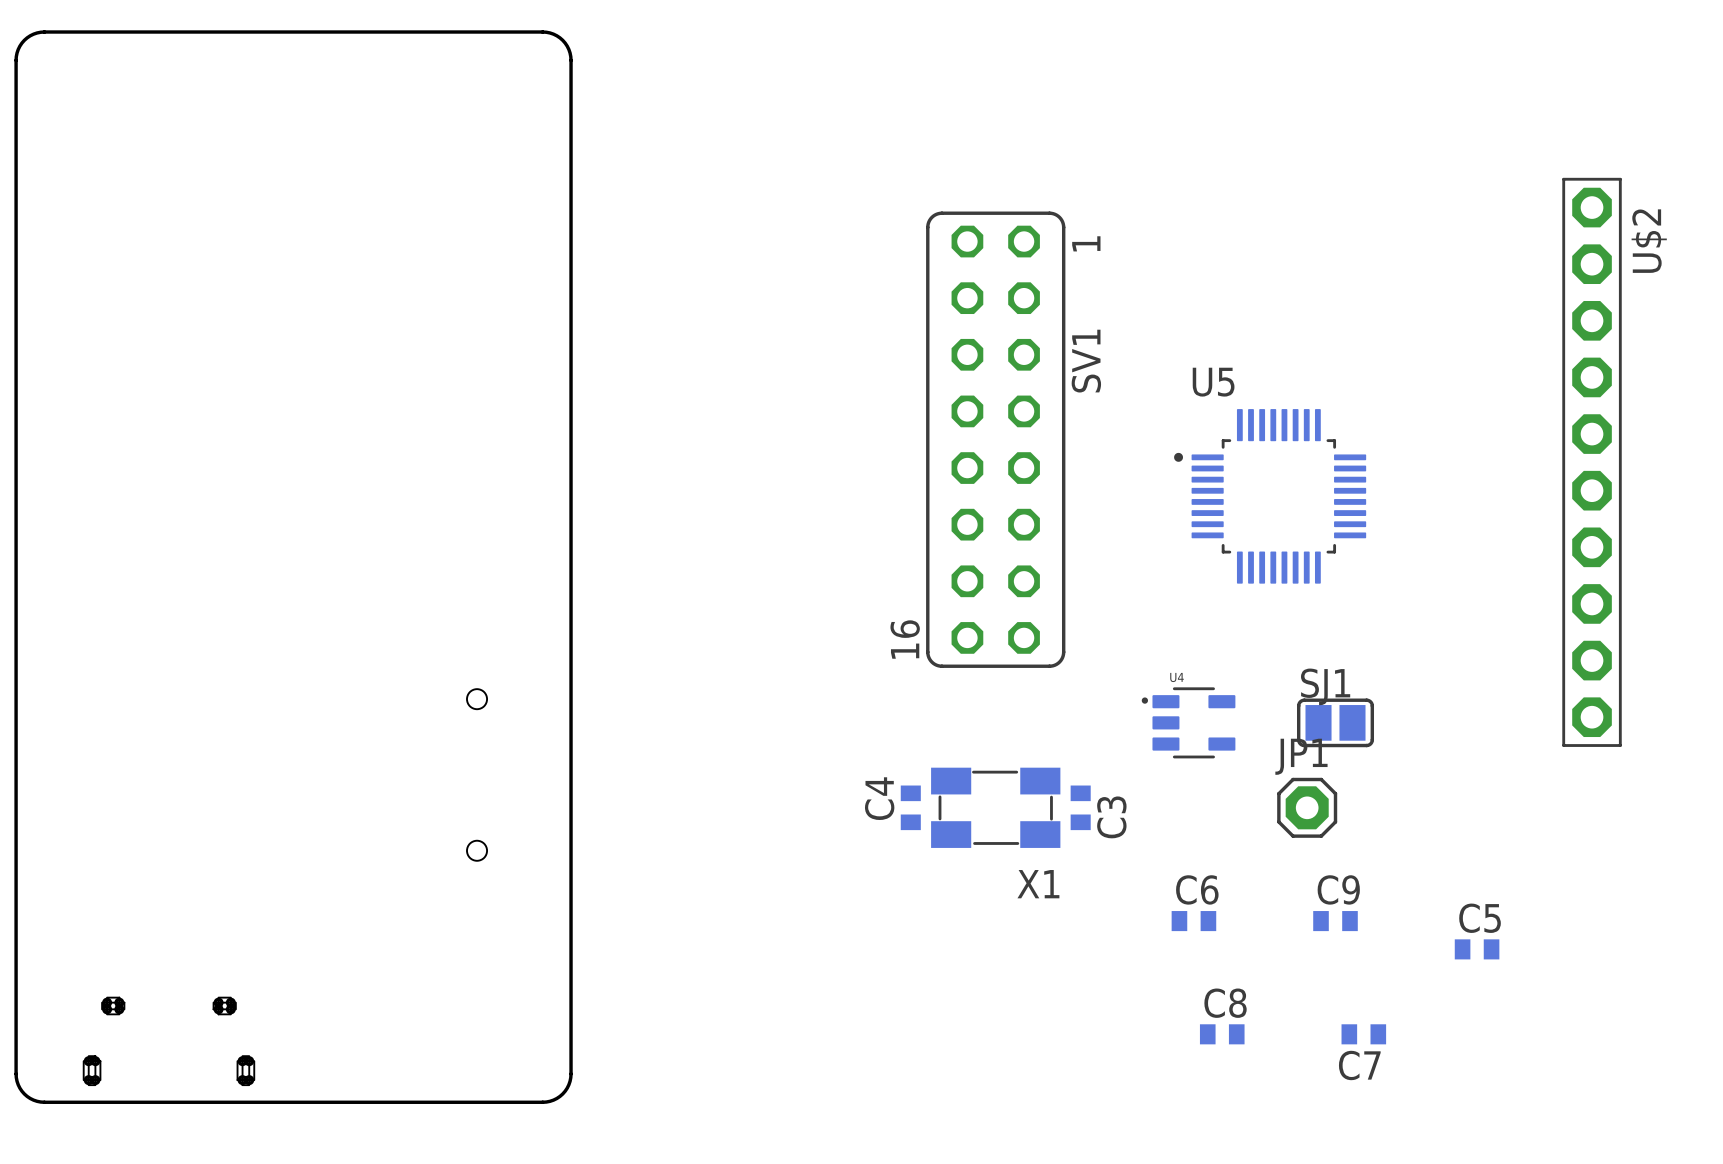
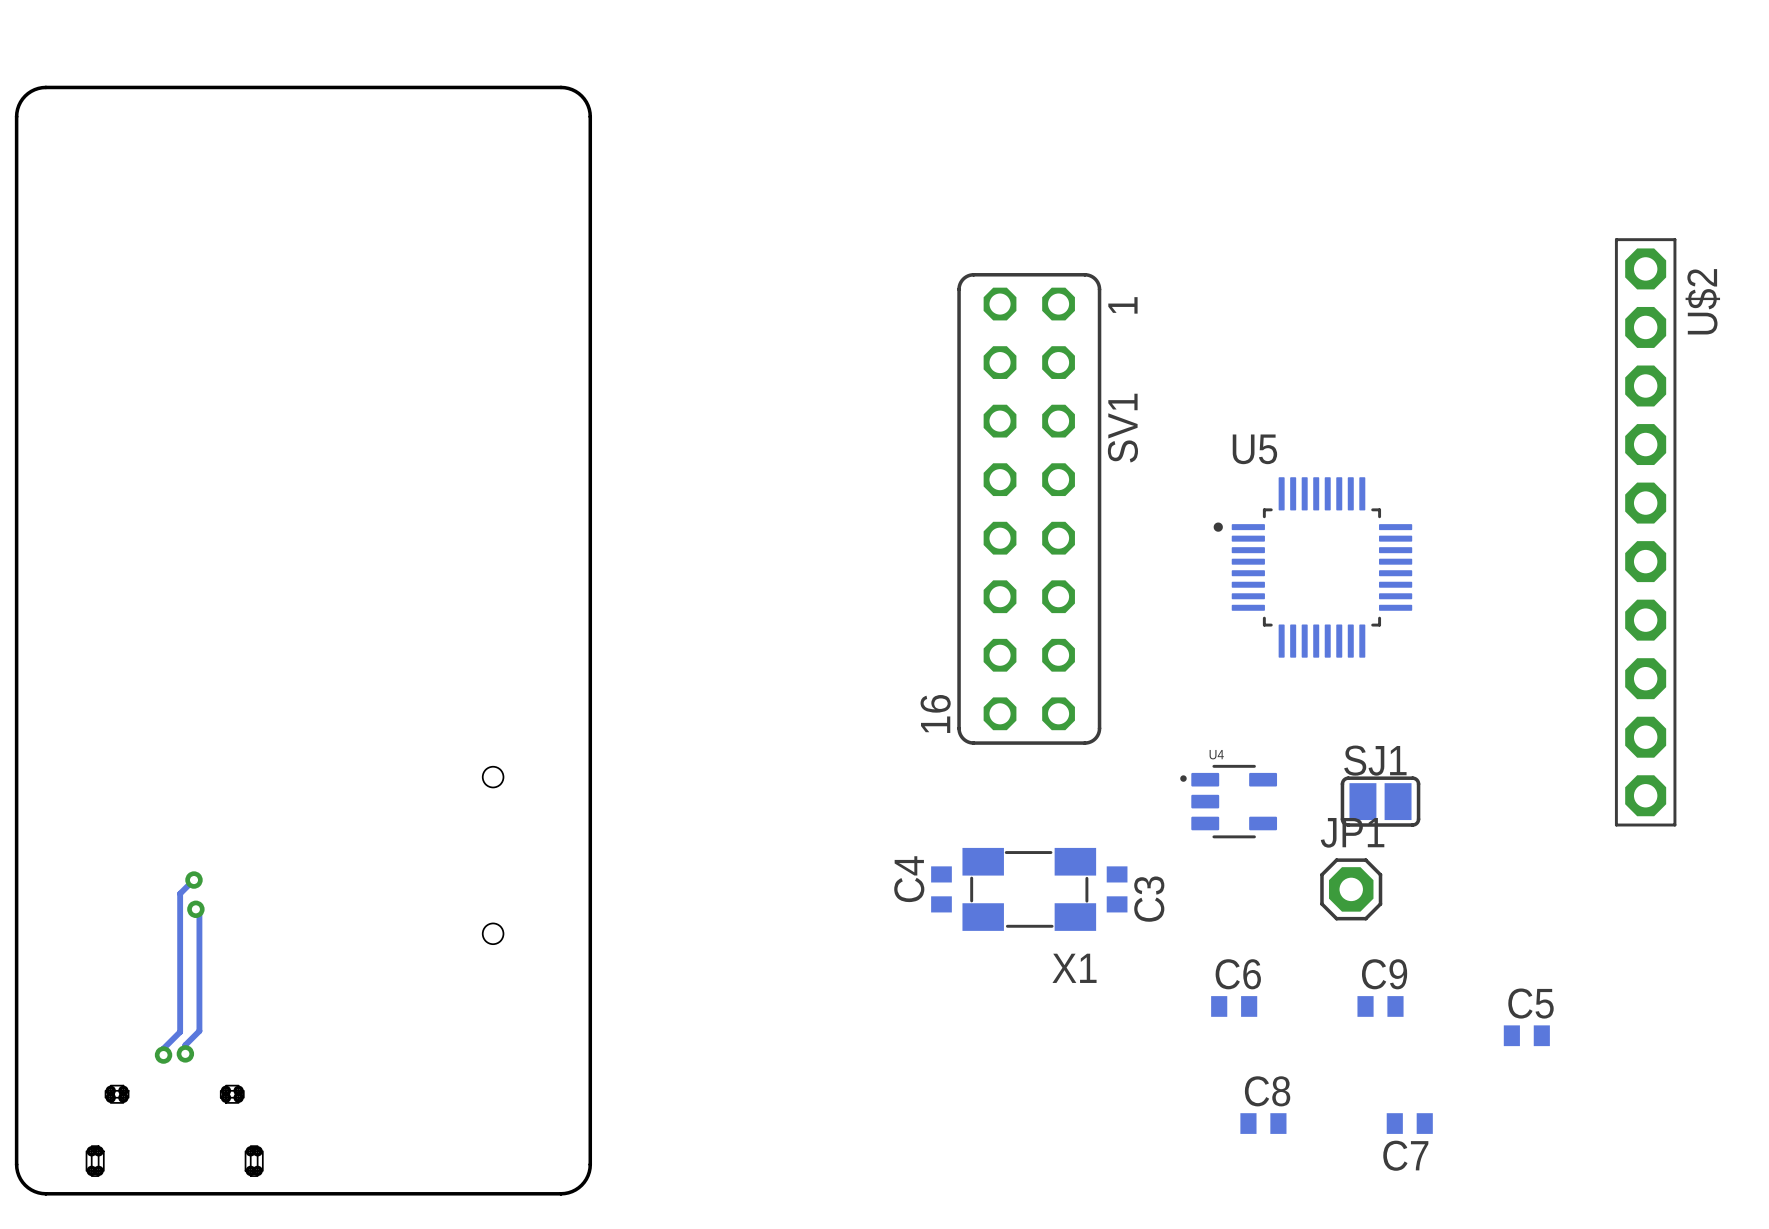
track: none -> (193, 880) (180, 893) (180, 1032) (163, 1048) (163, 1055)
via: none -> (193, 880)
track: none -> (195, 909) (199, 912) (199, 1031) (185, 1045) (185, 1053)
via: none -> (195, 909)
via: none -> (185, 1053)
via: none -> (163, 1055)

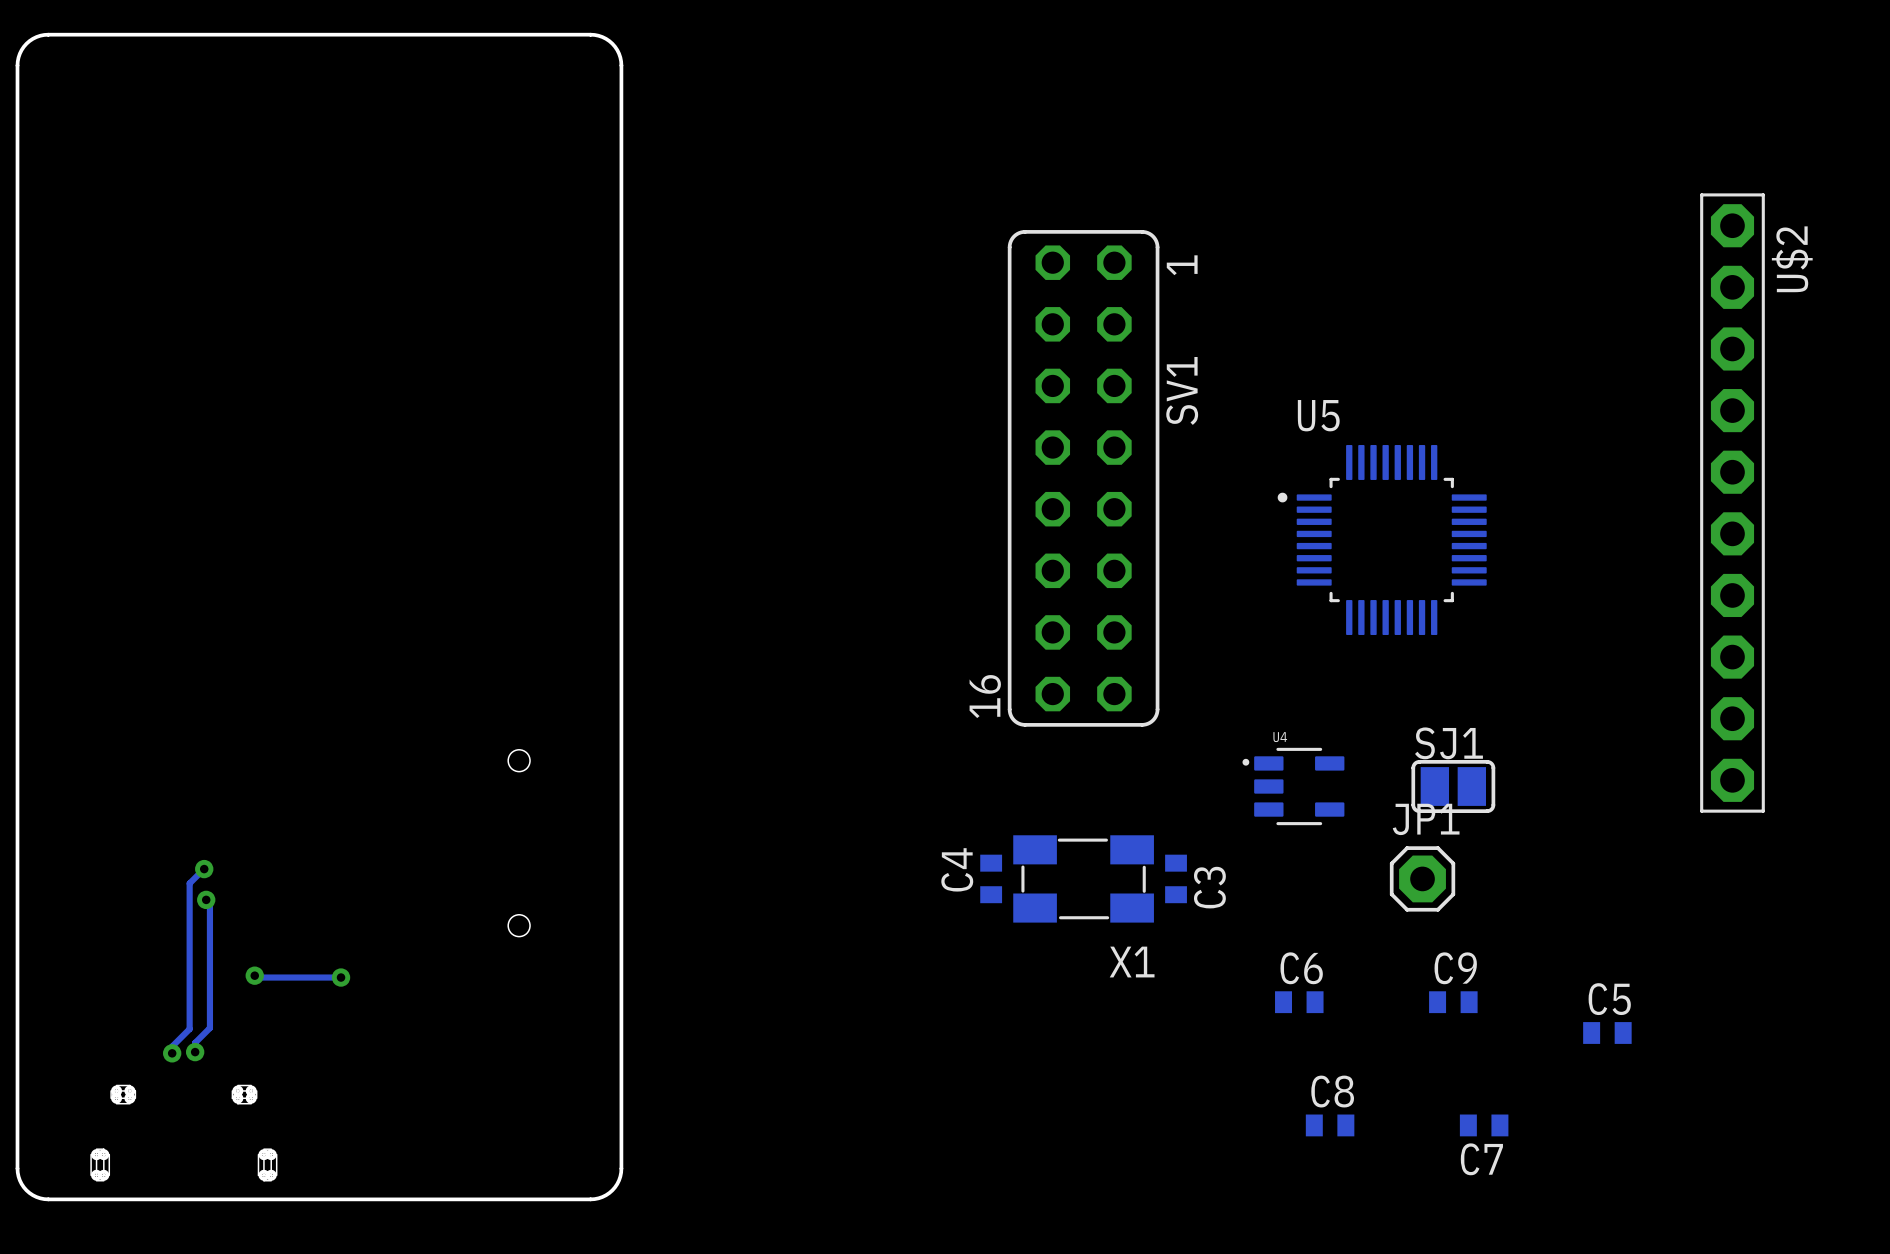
track: none -> (254, 975) (256, 977) (341, 977)
via: none -> (254, 975)
via: none -> (341, 977)

